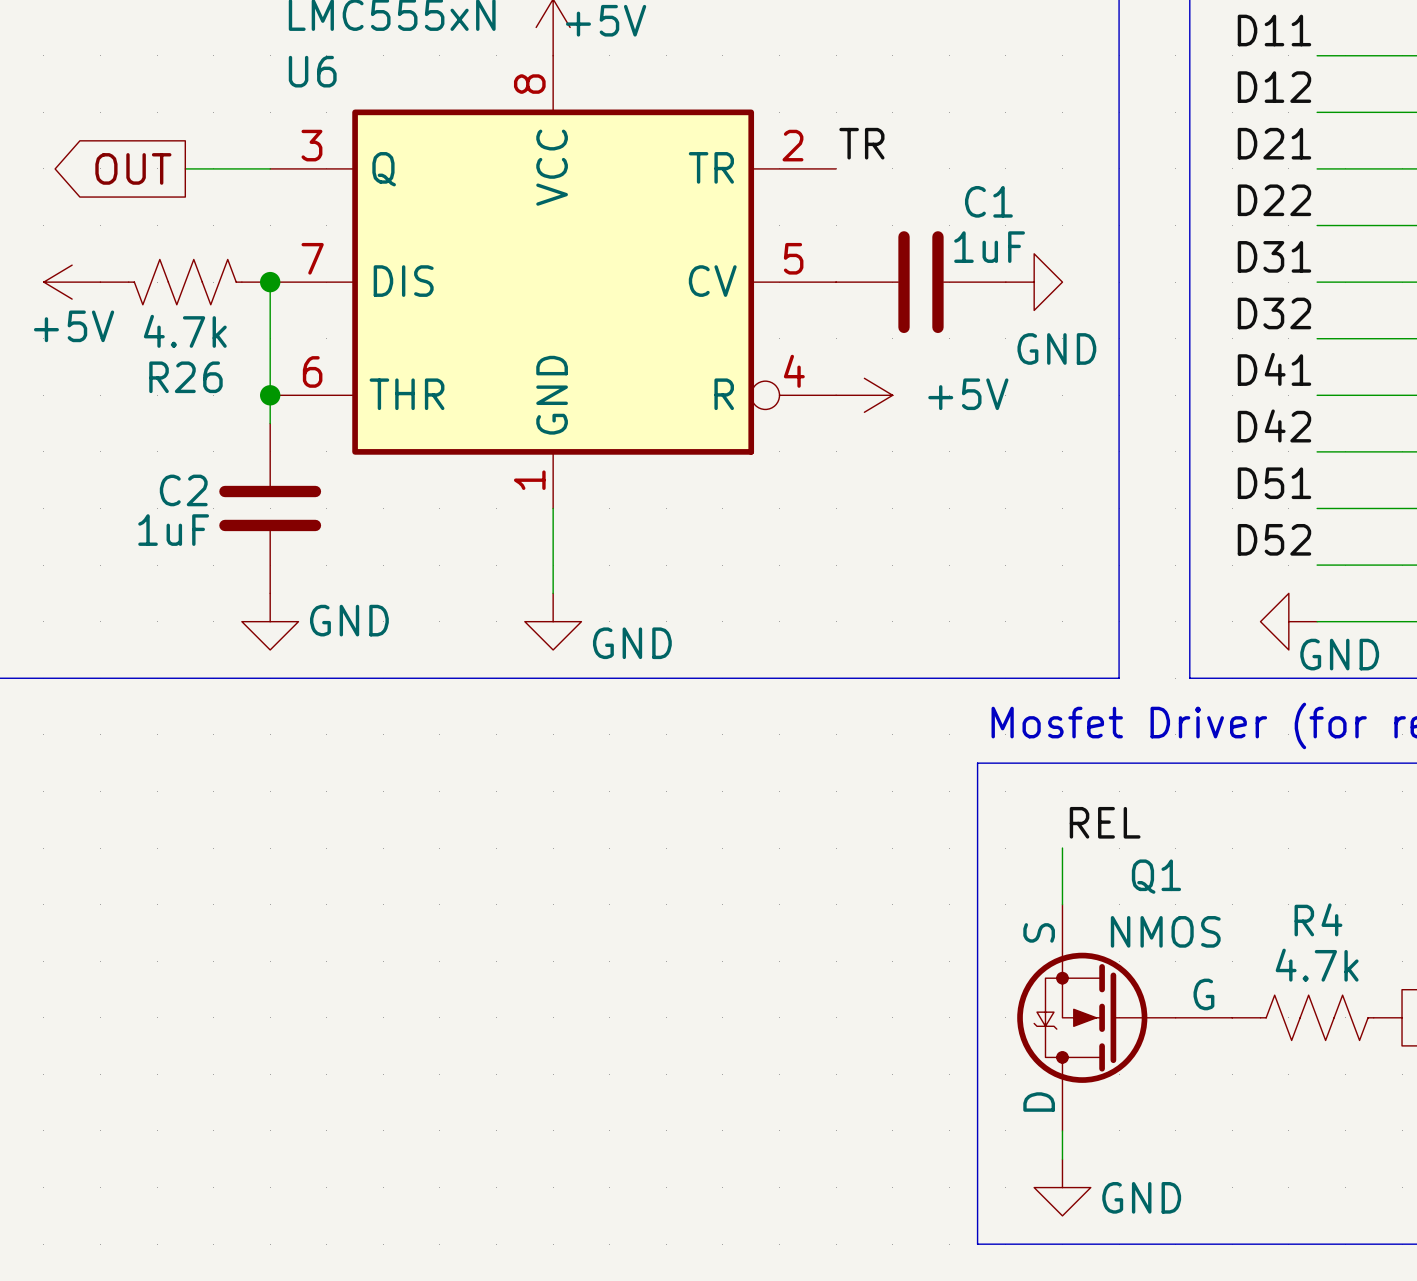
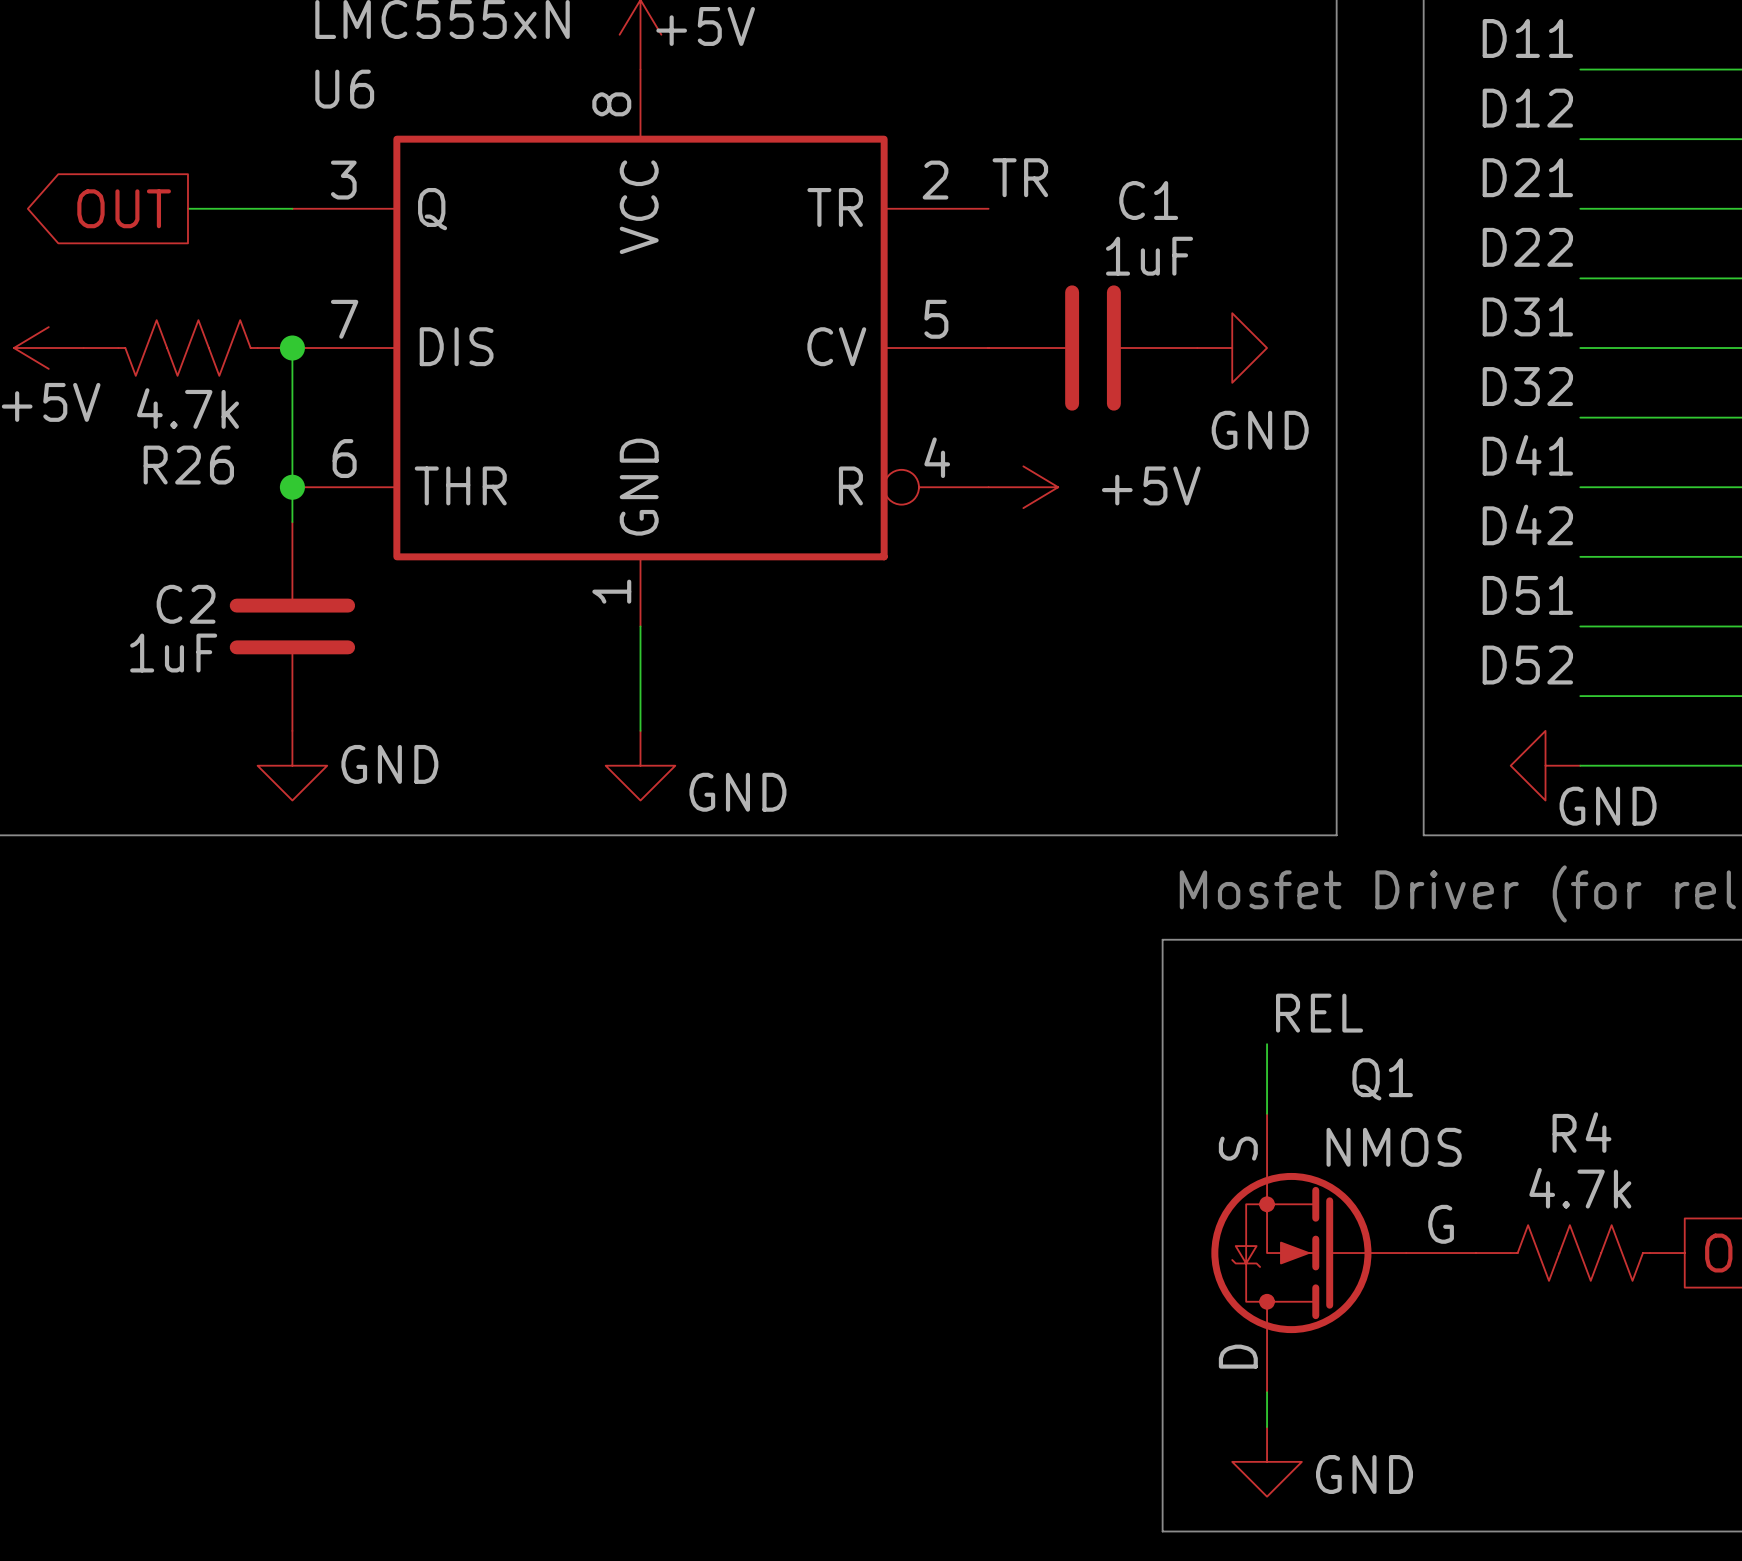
C1 name position: C1 (988, 201) -> C1 (1148, 200)
C1 value position: 1uF (989, 247) -> 1uF (1149, 256)

